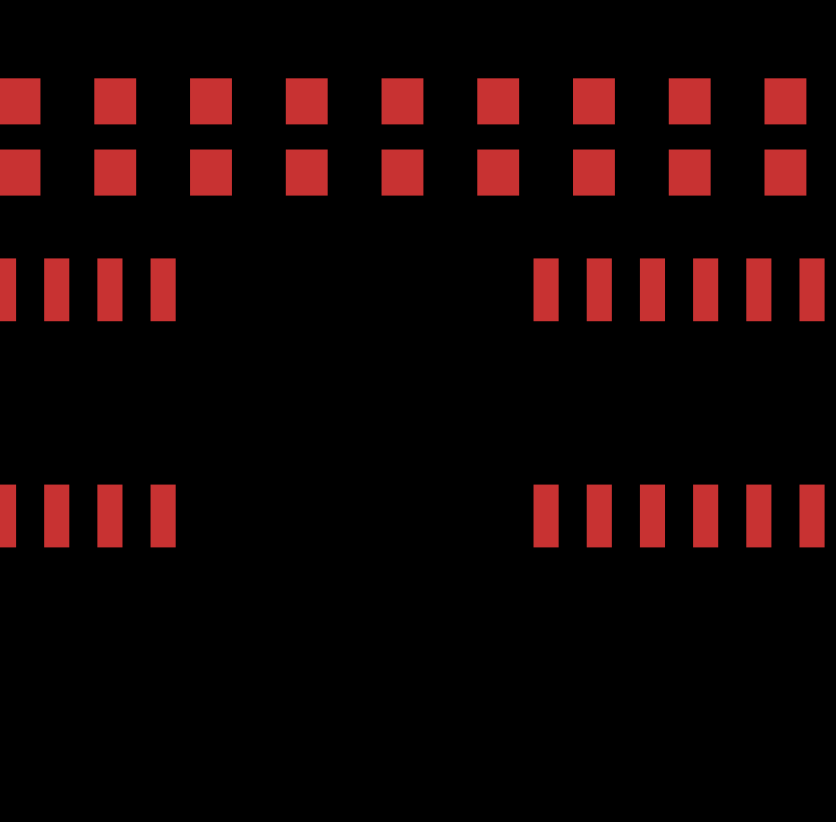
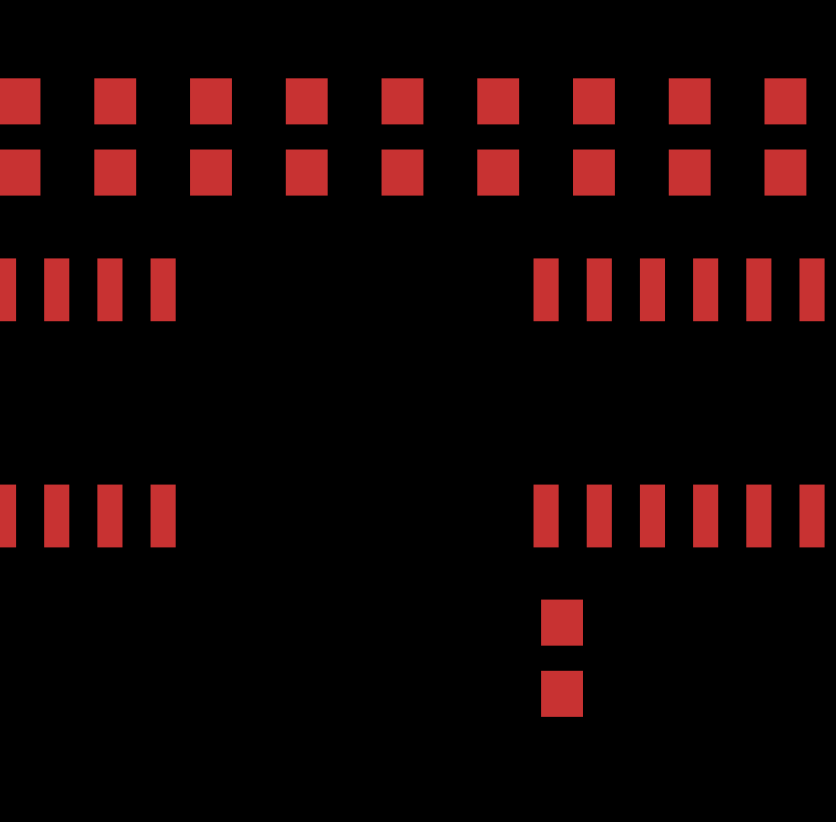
part: none -> (562, 658)

